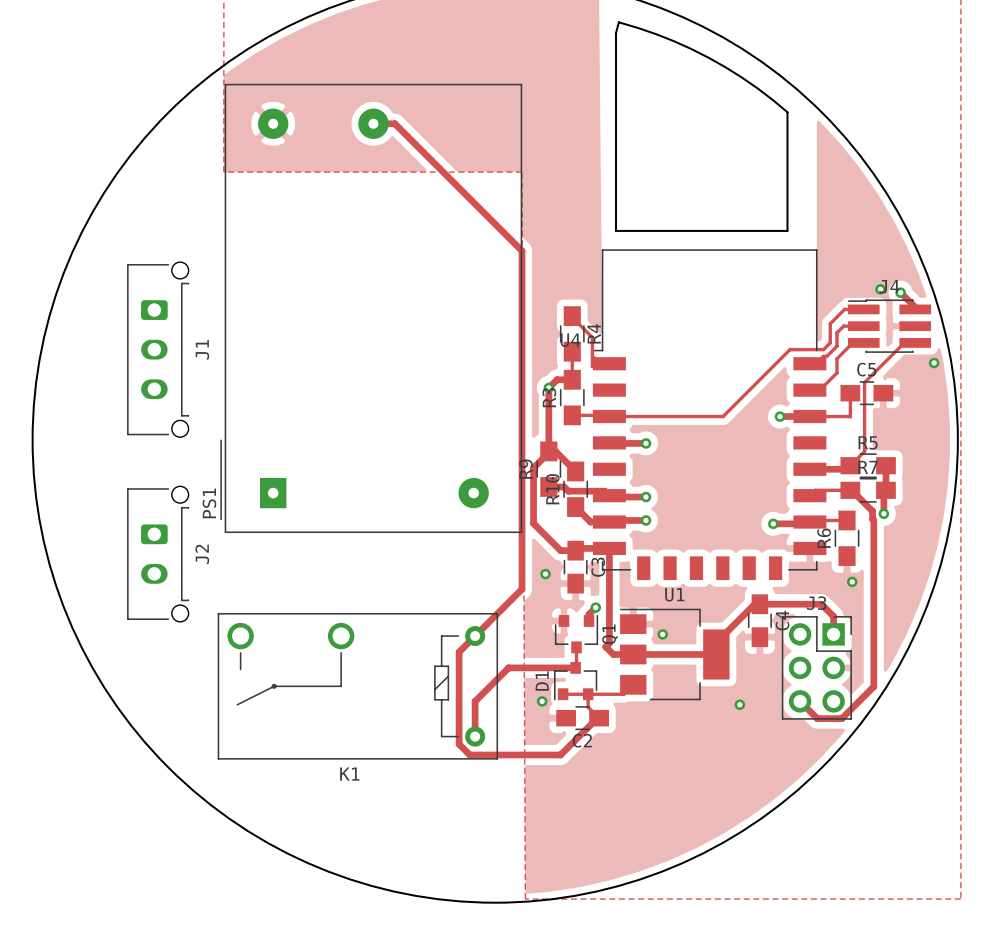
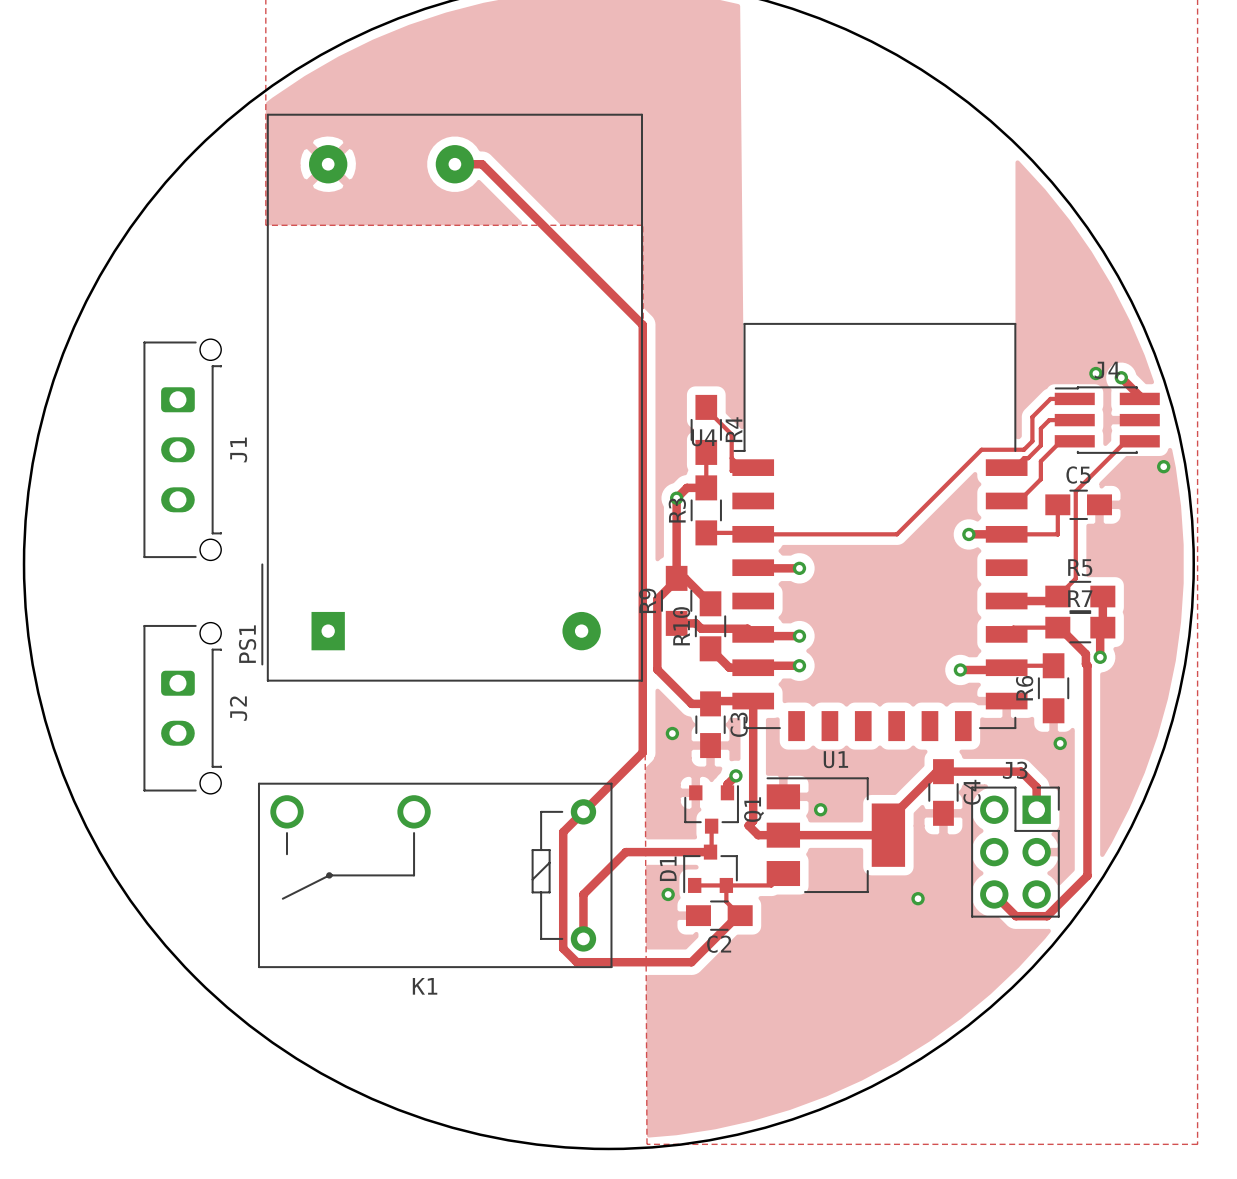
board edge: (618, 22) (616, 33) (616, 230) (787, 230) (787, 112) (741, 77) (708, 57) (673, 41) (618, 22) -> none

